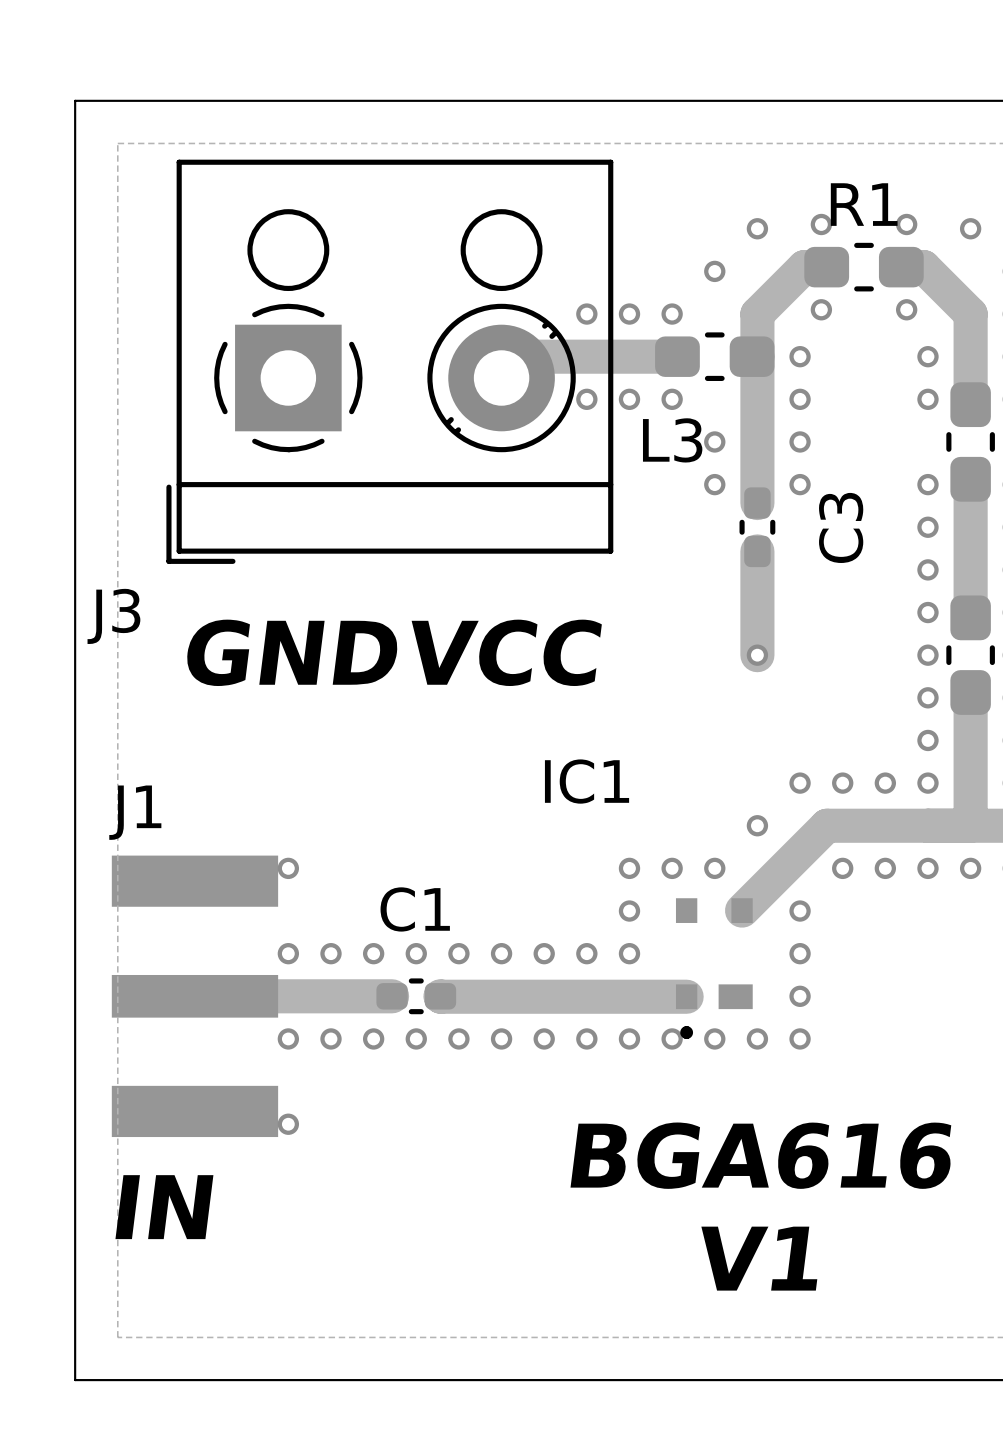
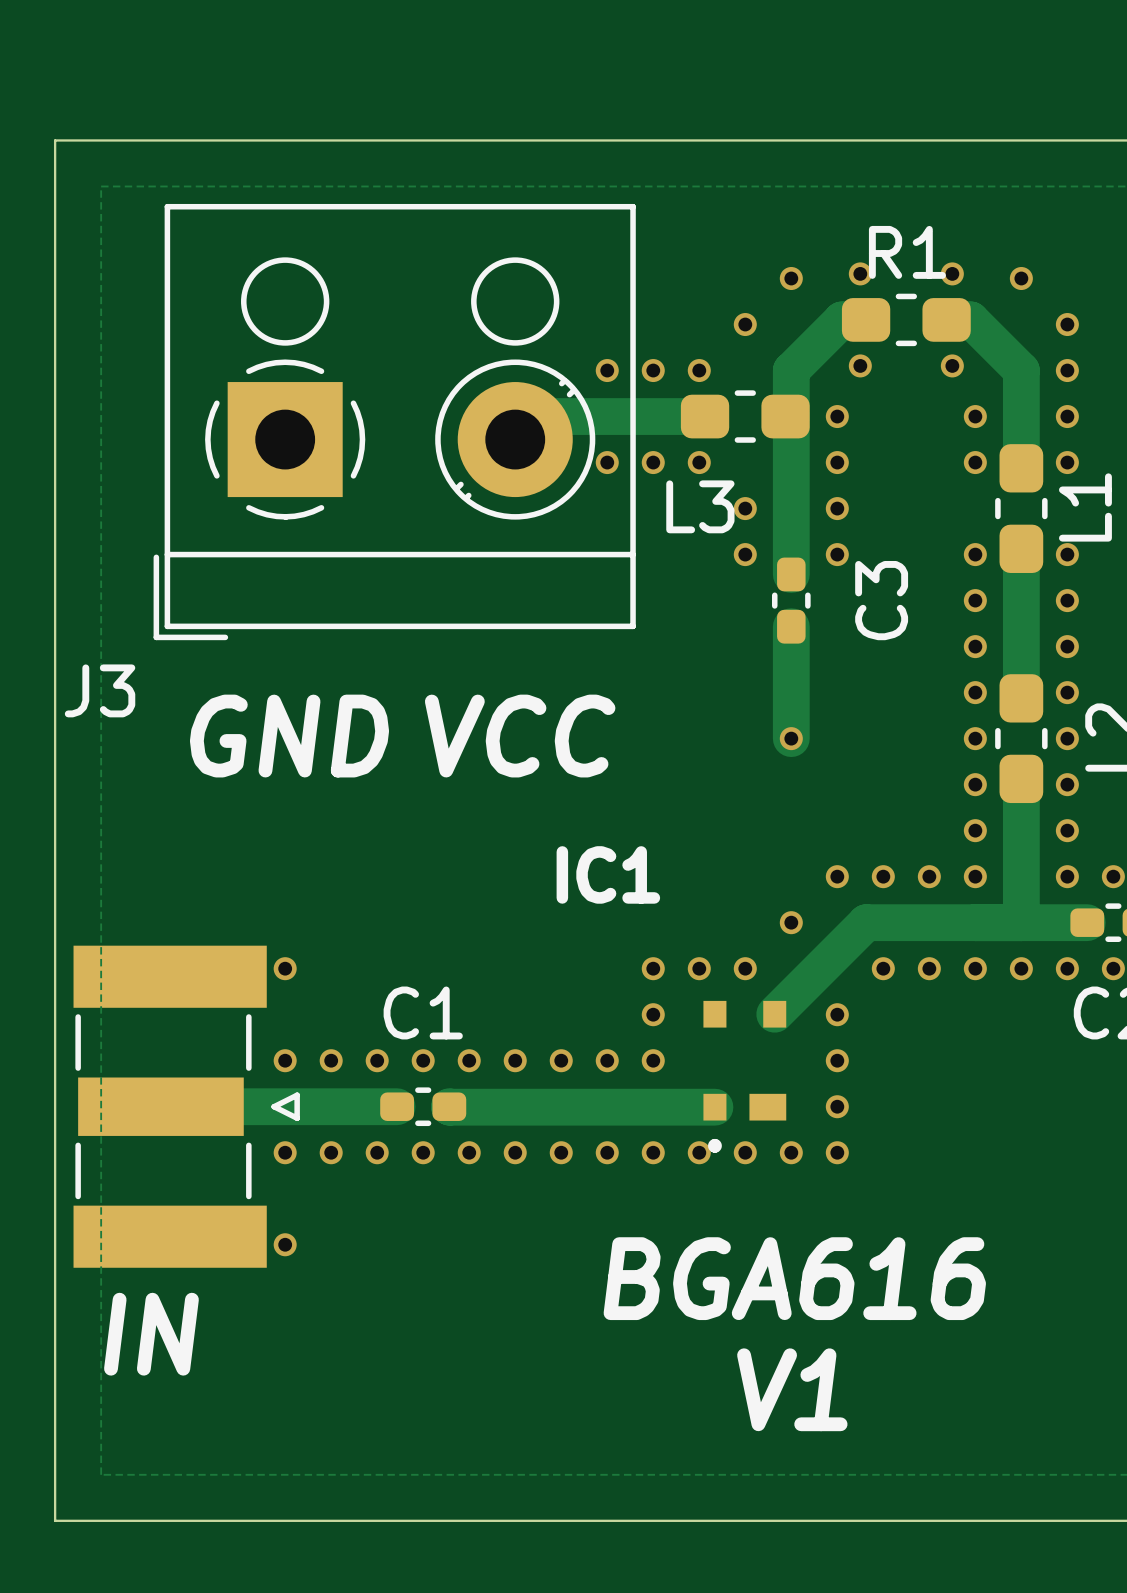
J1: (194, 996) -> none
part: none -> (186, 1106)

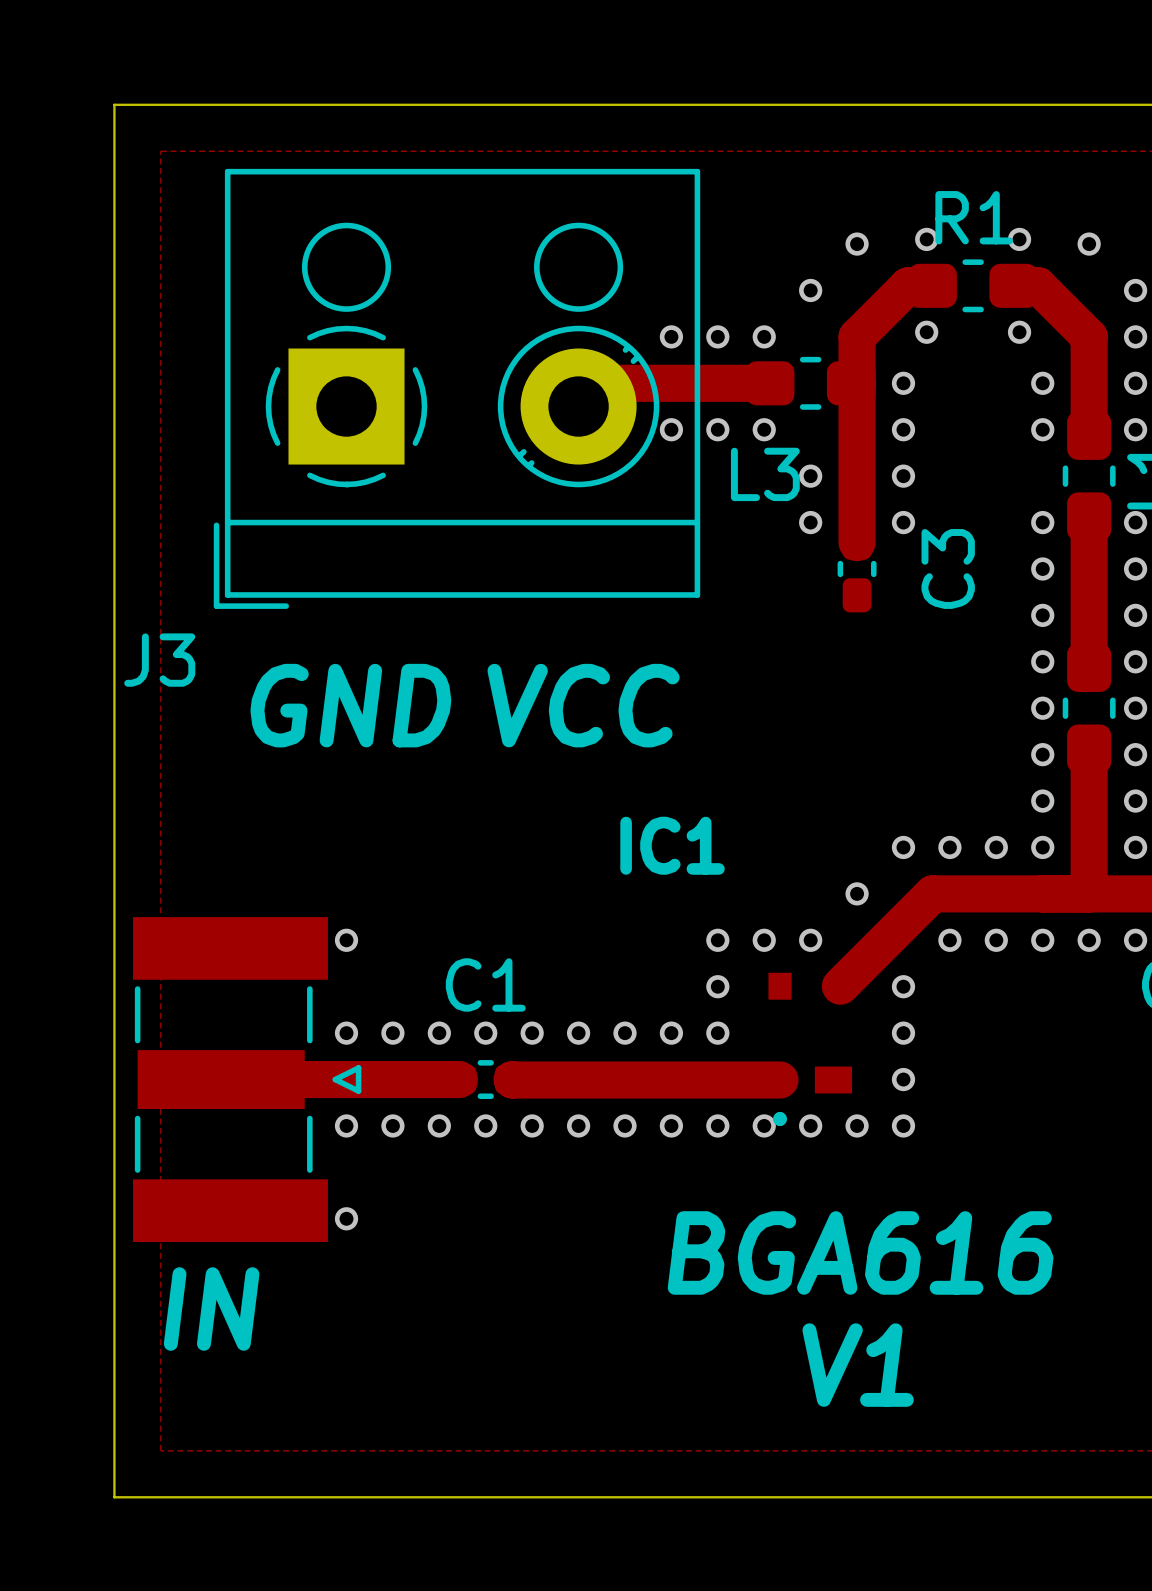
track: (791, 626) (791, 738) -> none
via: (791, 738) -> none

